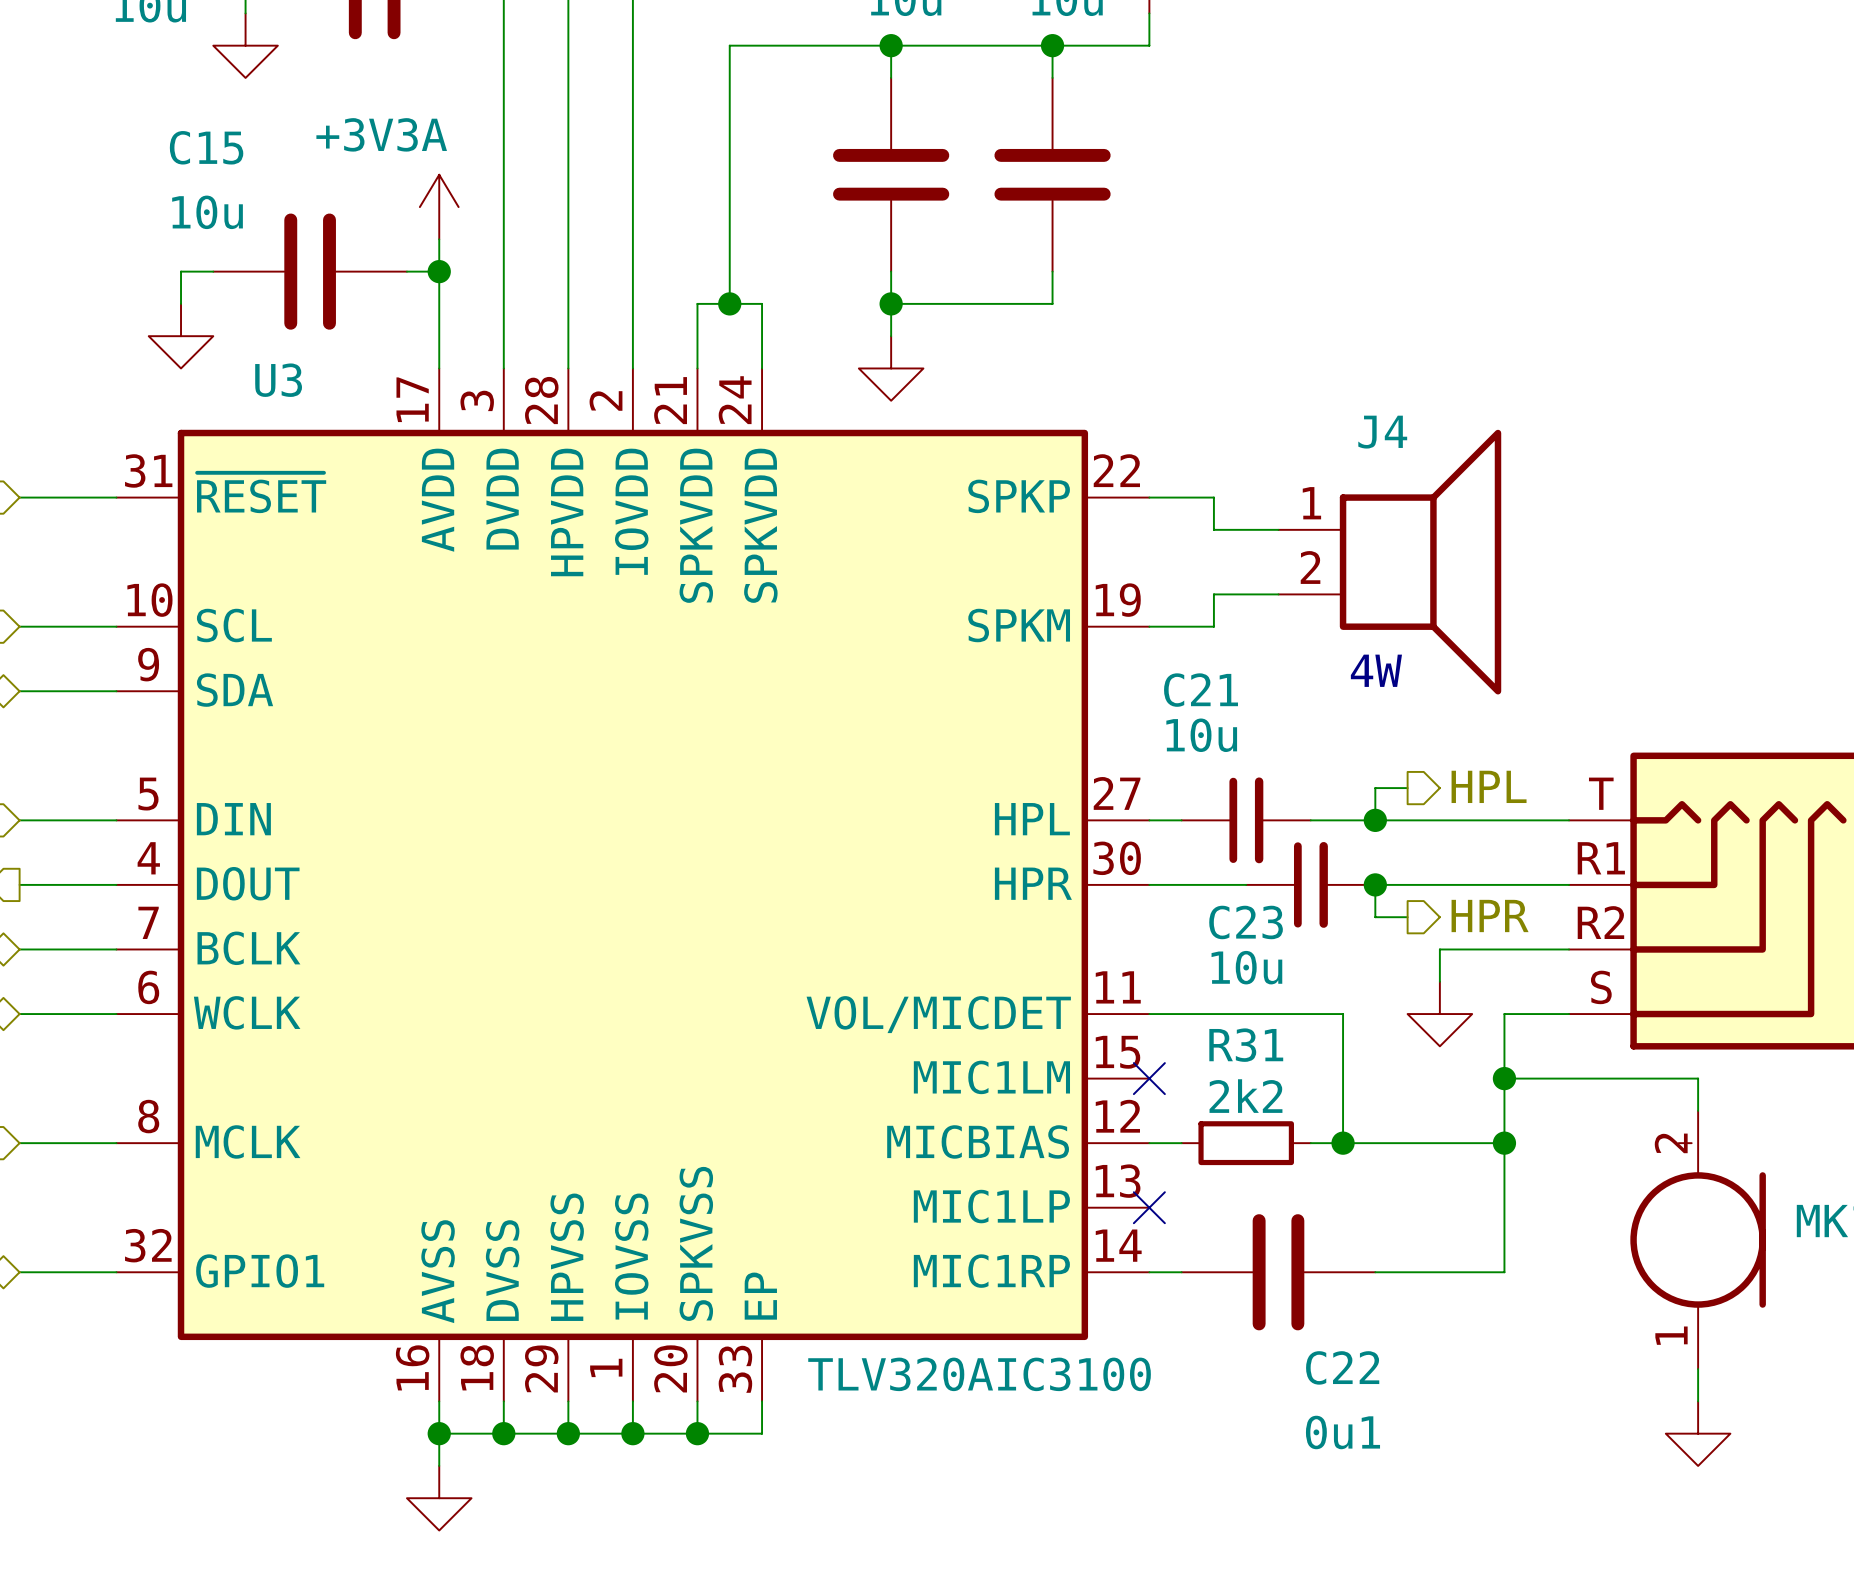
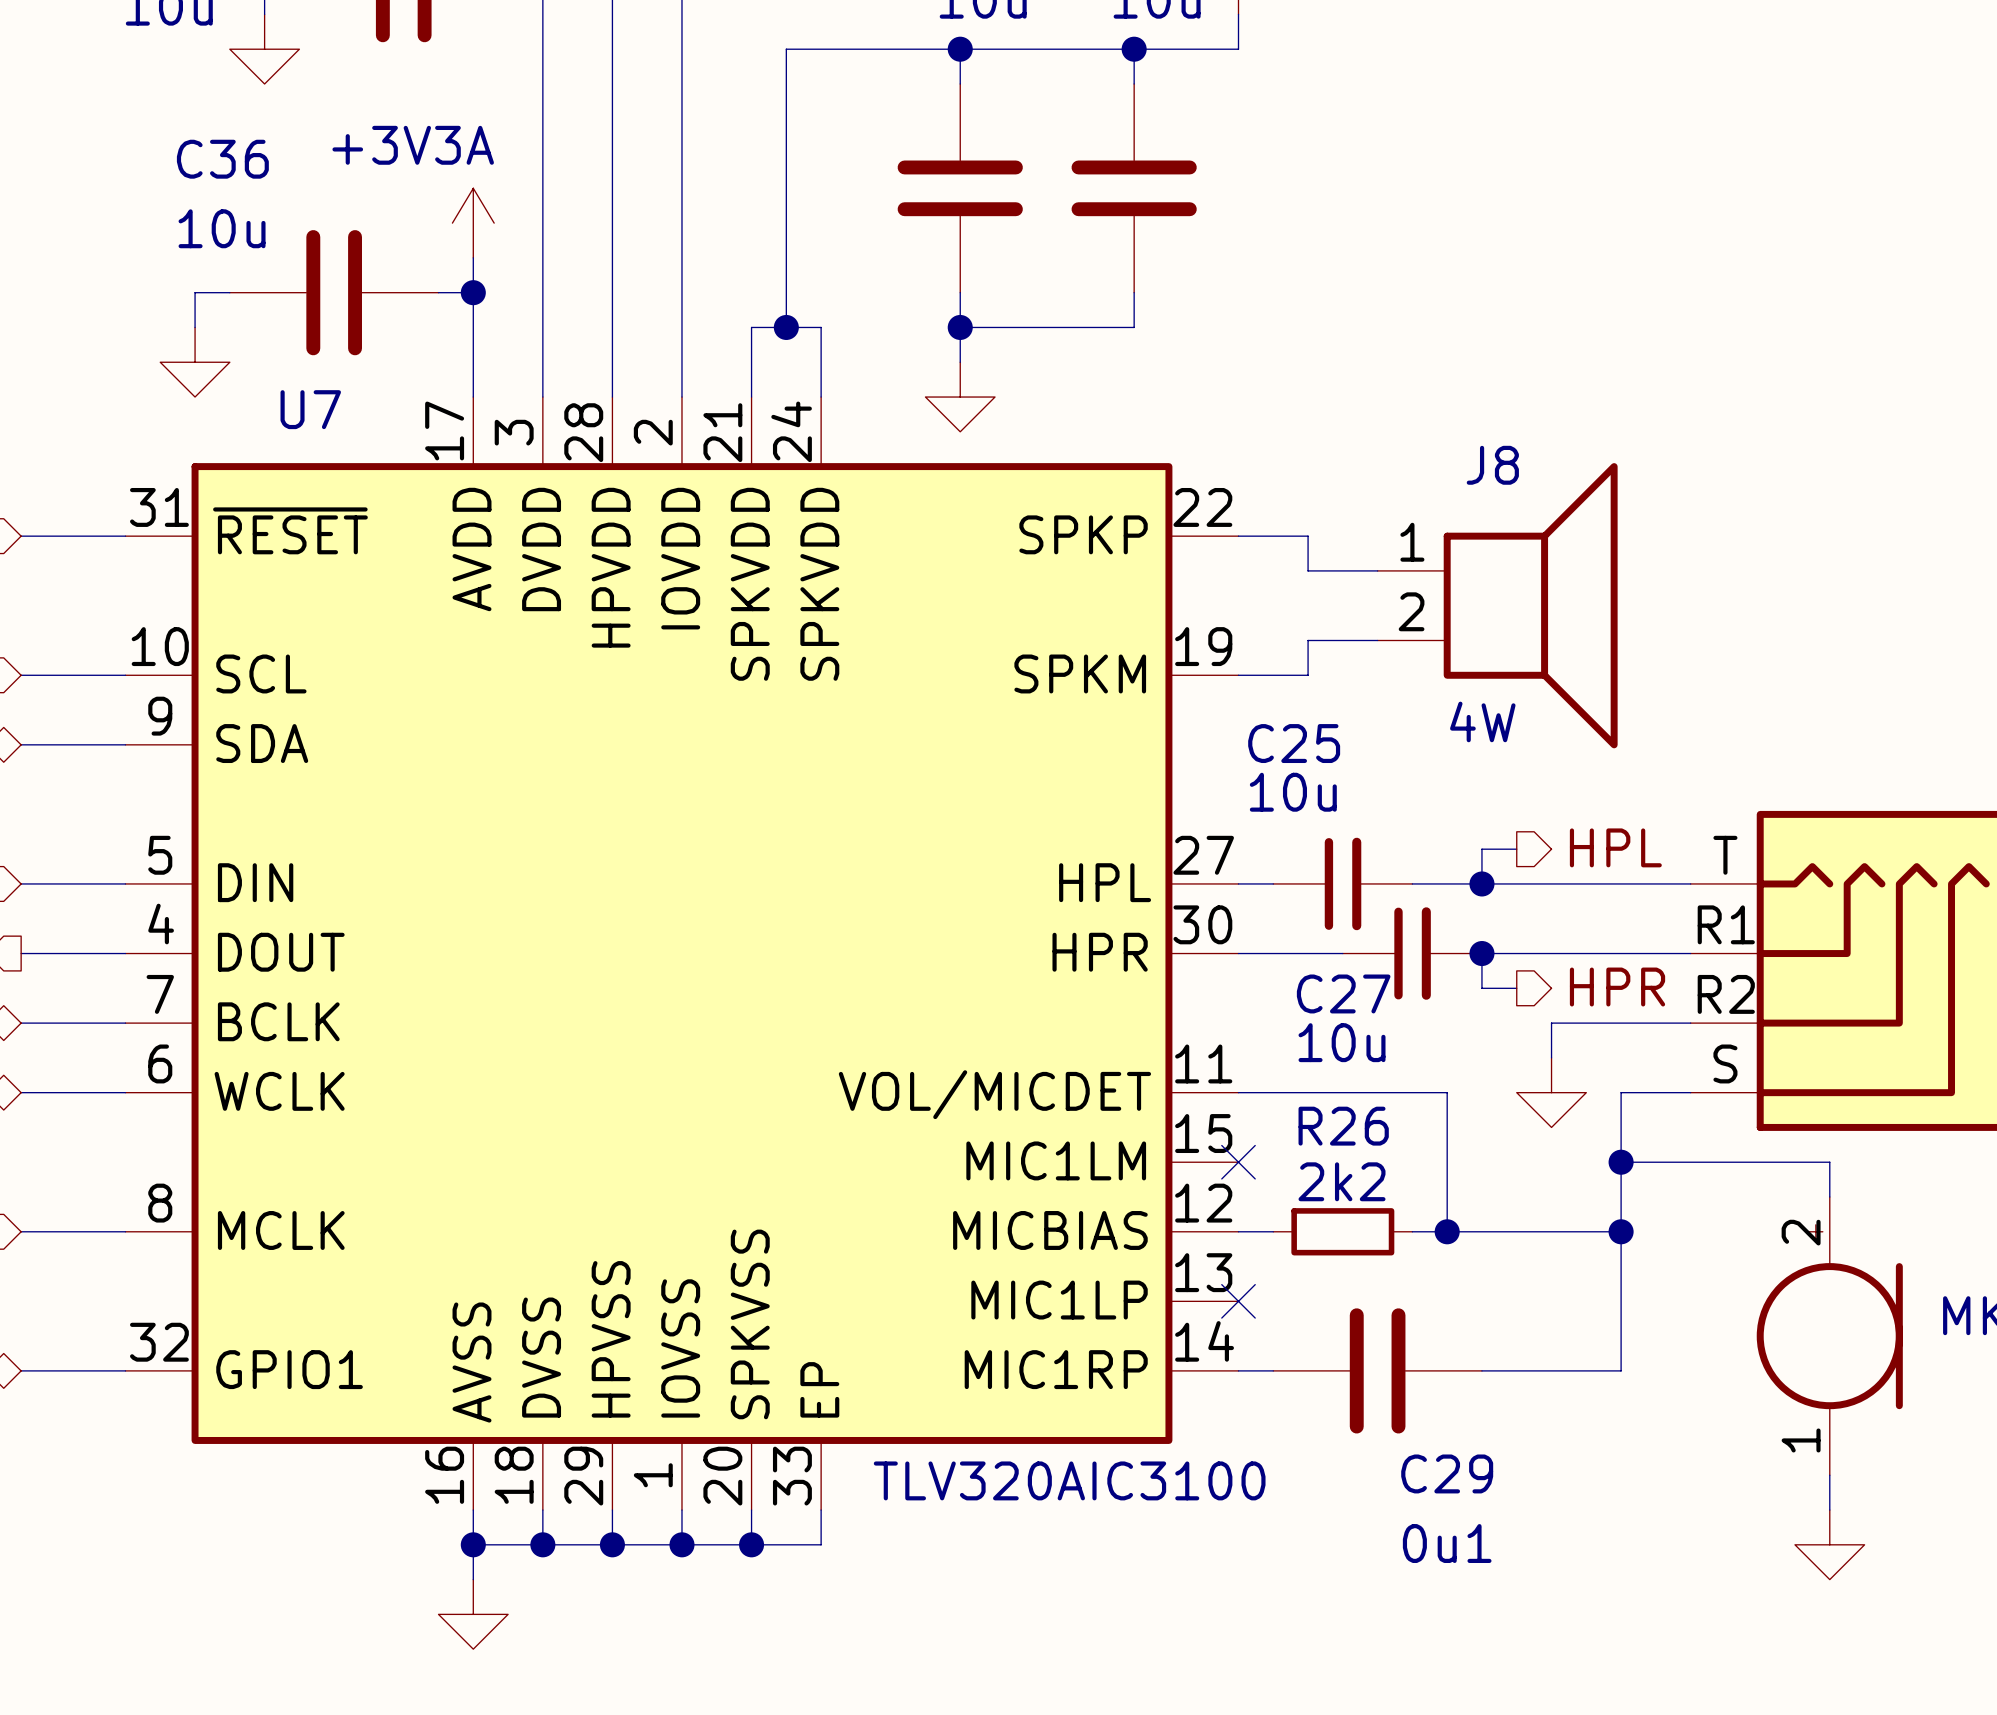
C15 name: C15 (206, 147) -> C36 (222, 159)
U3 name: U3 (278, 380) -> U7 (310, 409)
J4 name: J4 (1382, 432) -> J8 (1492, 465)
C21 name: C21 (1201, 690) -> C25 (1294, 743)
C23 name: C23 (1246, 922) -> C27 (1343, 993)
R31 name: R31 (1246, 1045) -> R26 (1343, 1126)
C22 name: C22 (1342, 1367) -> C29 (1447, 1473)

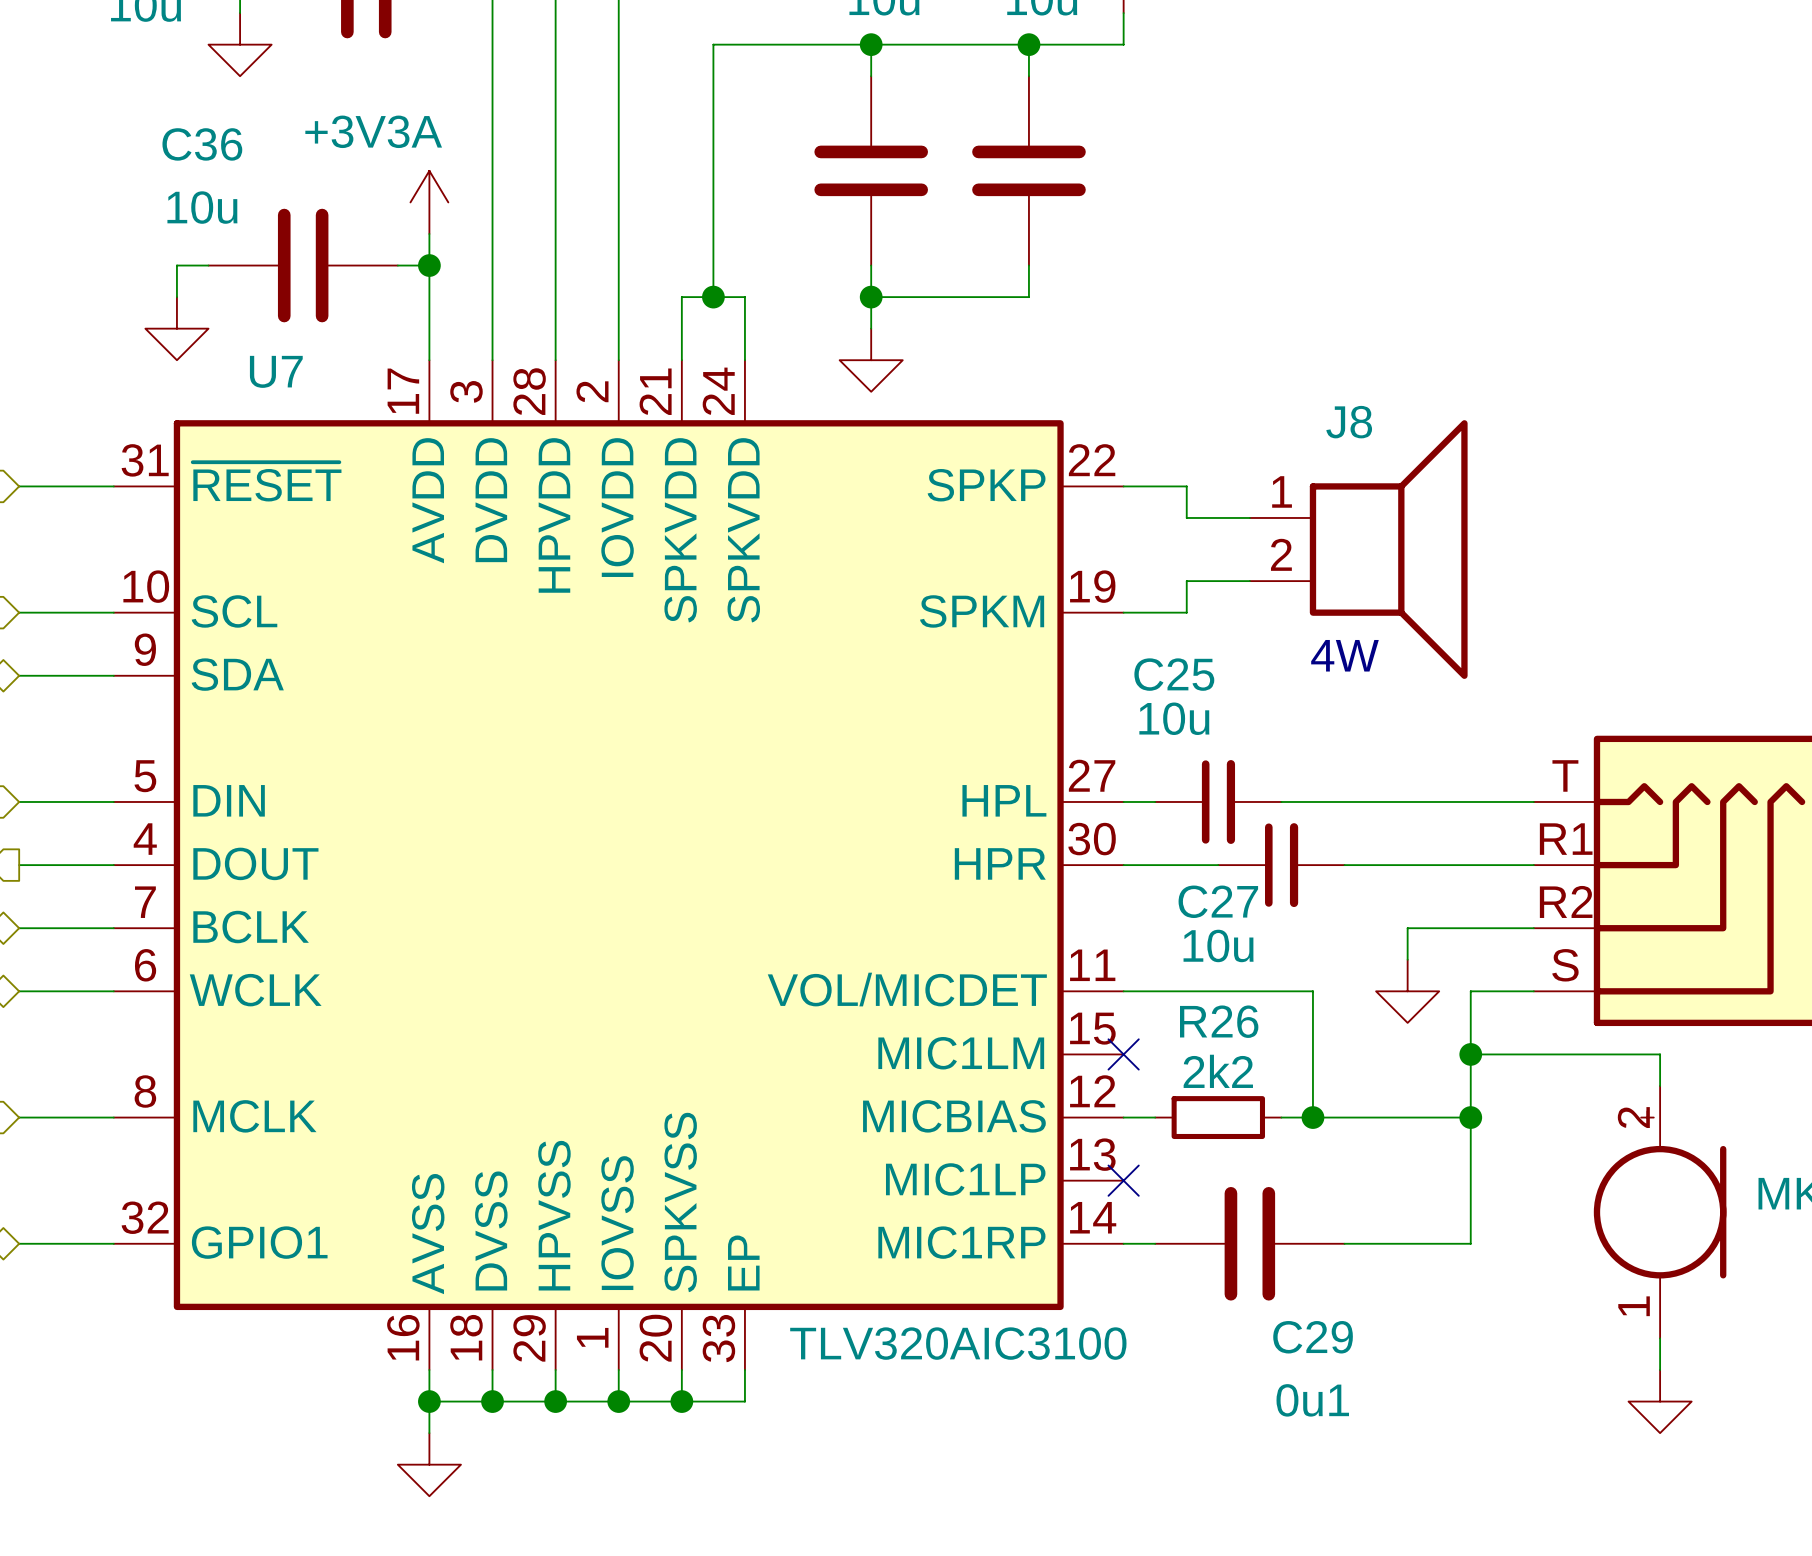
hierarchical label: HPL (1615, 847) -> none
wire: (1516, 849) (1481, 849) (1481, 883) -> none
junction: (1481, 883) -> none
wire: (1481, 953) (1481, 988) (1516, 988) -> none
junction: (1481, 953) -> none
hierarchical label: HPR (1617, 987) -> none

